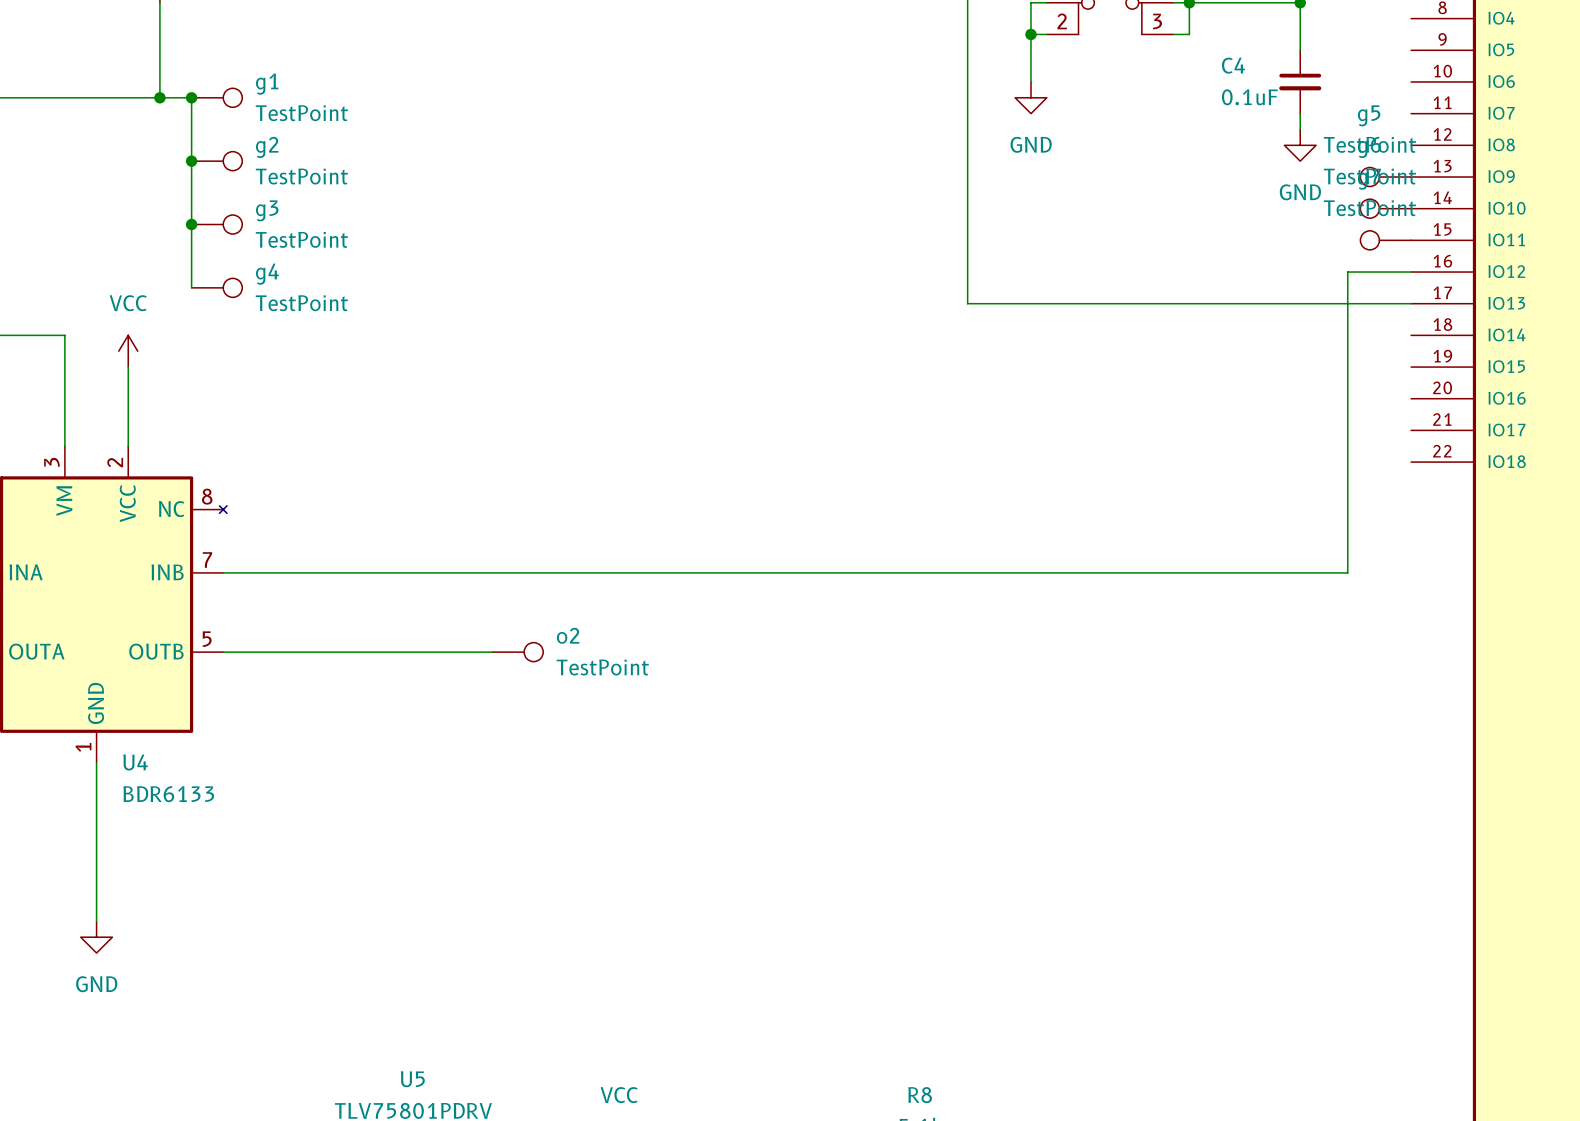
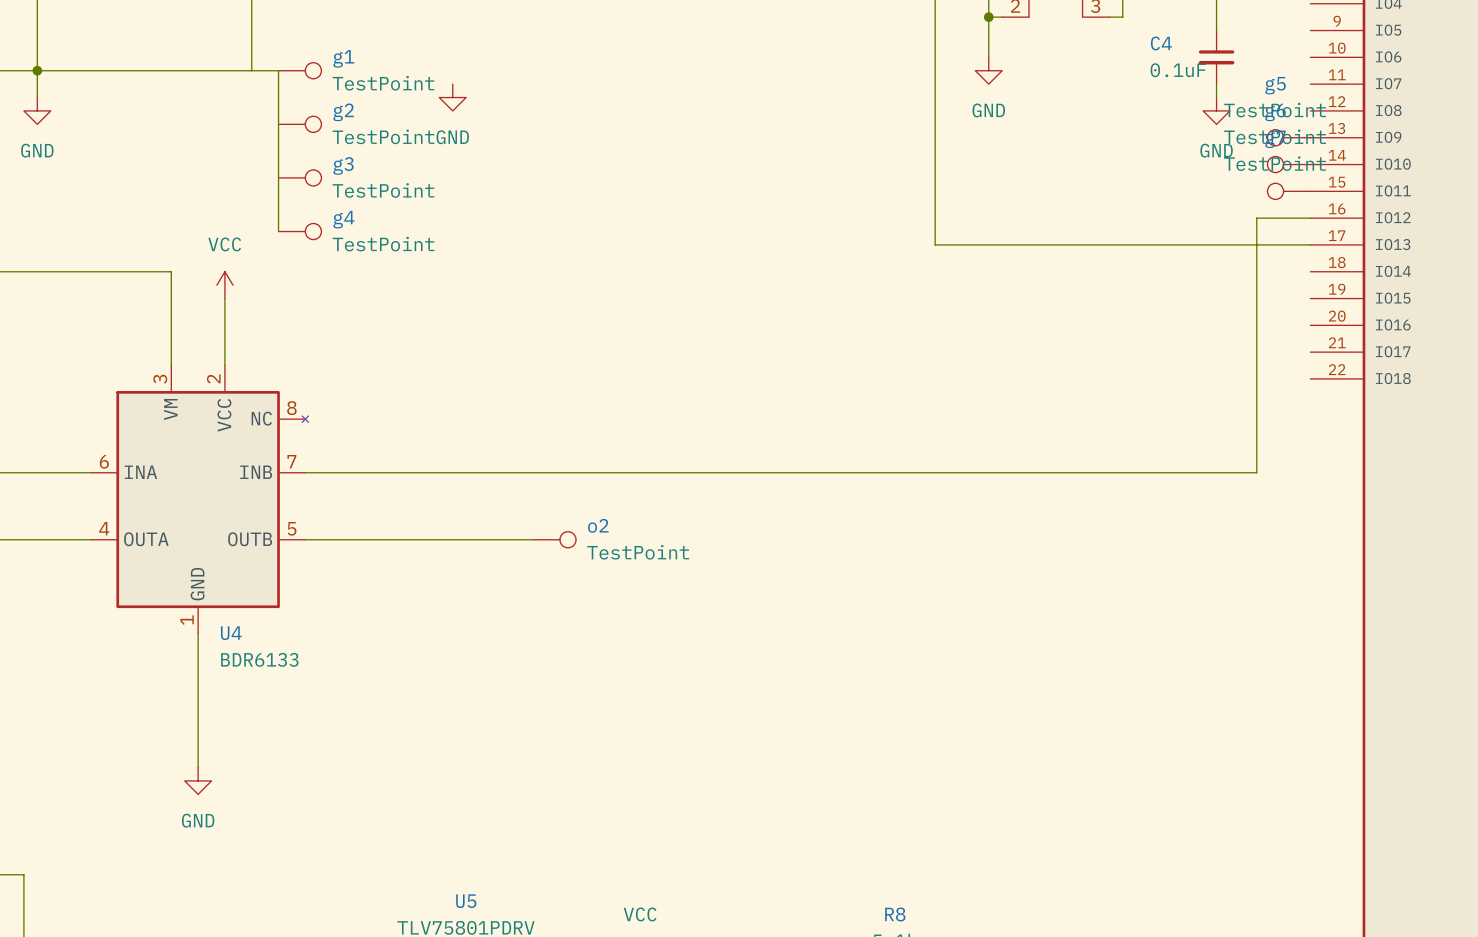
junction: (159, 97) -> none
junction: (191, 97) -> none
power symbol: none -> GND (452, 97)
junction: (191, 161) -> none
junction: (191, 224) -> none

